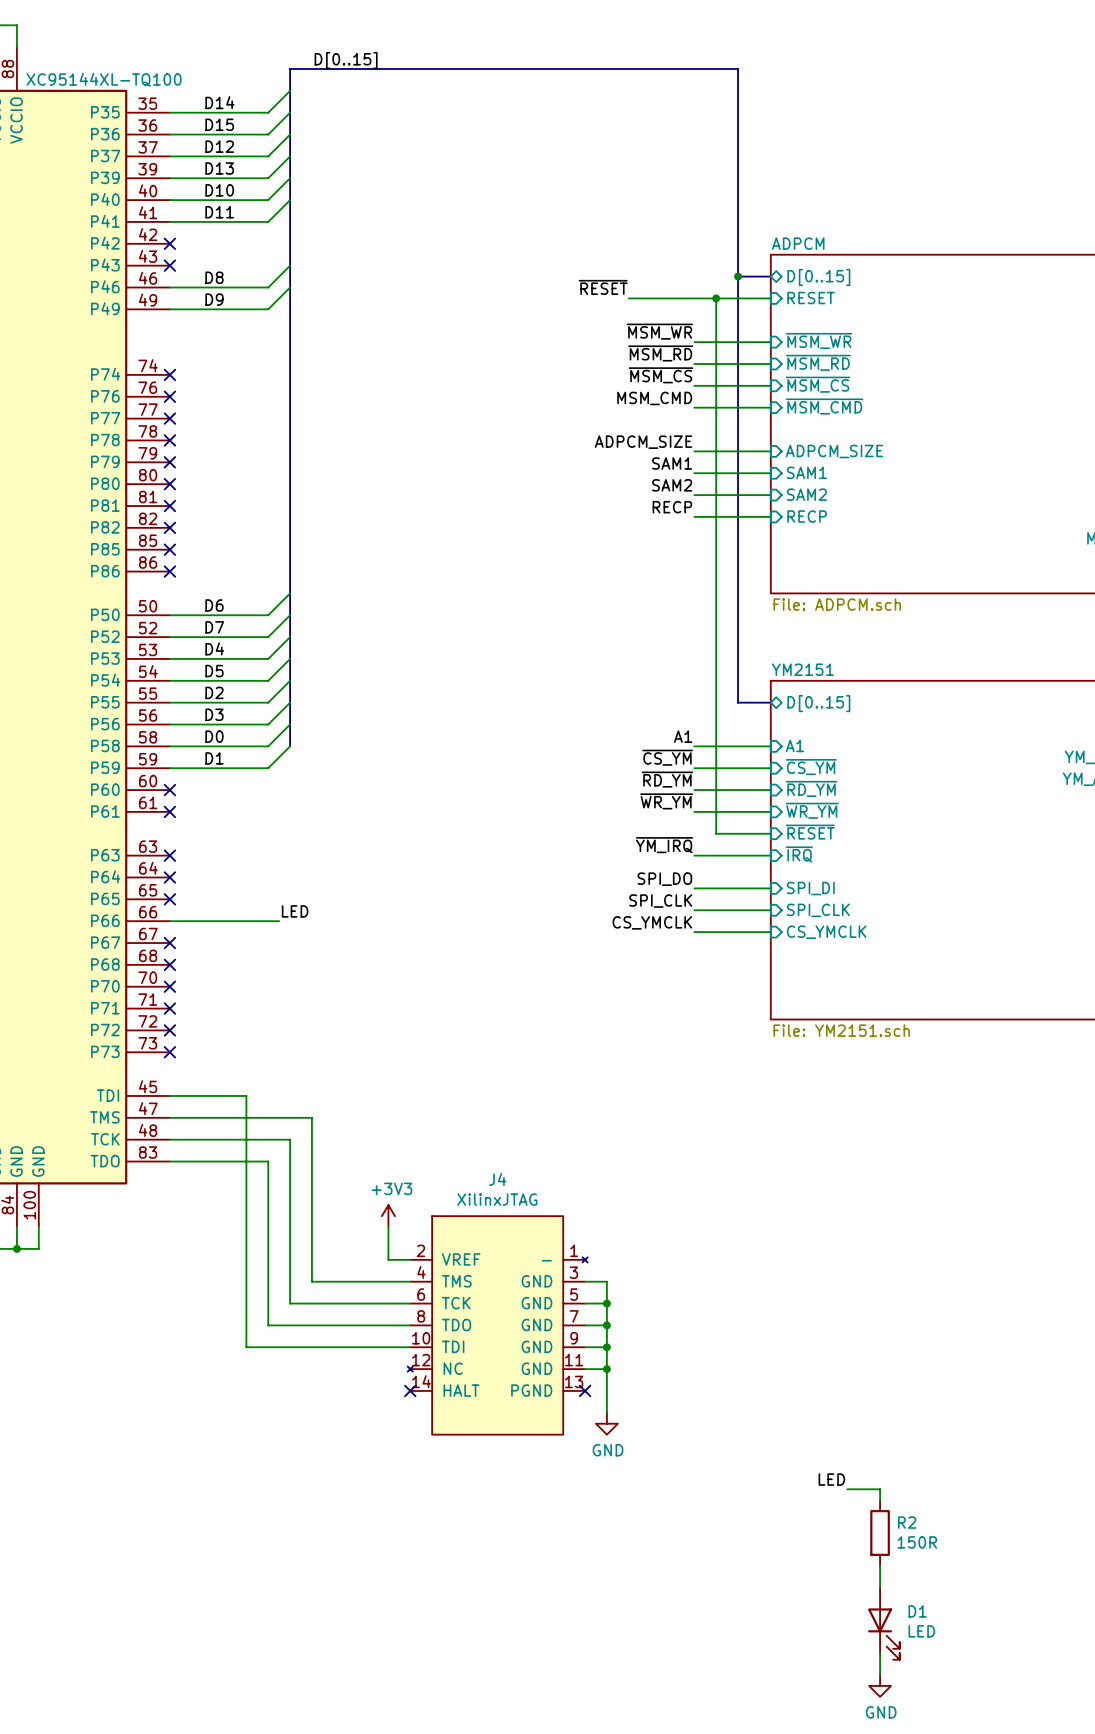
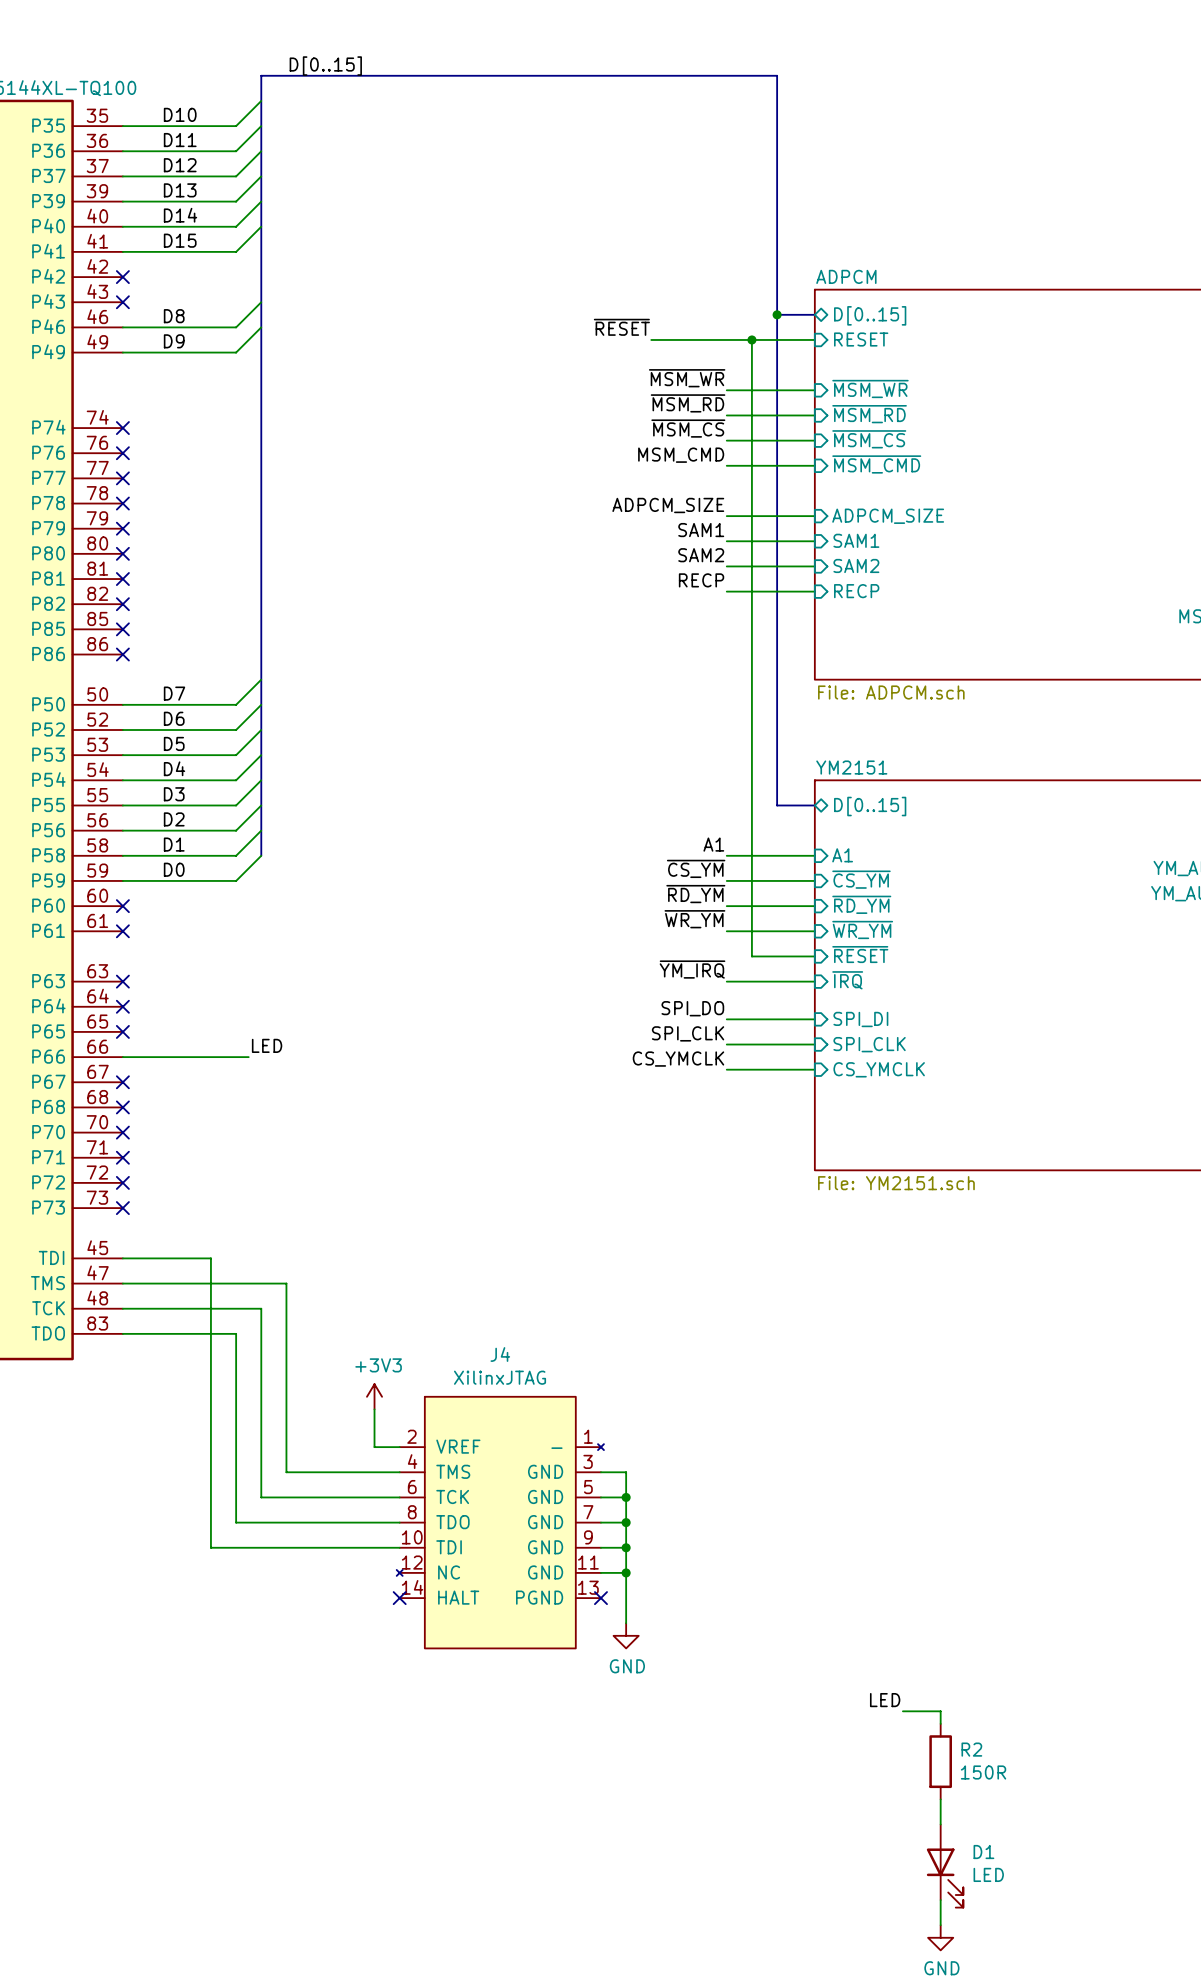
label: D14 (219, 102) -> D10 (180, 114)
label: D15 (219, 124) -> D11 (180, 140)
label: D10 (219, 190) -> D14 (180, 215)
label: D11 (219, 212) -> D15 (180, 240)
label: D6 (214, 605) -> D7 (174, 693)
label: D7 (214, 627) -> D6 (174, 718)
label: D4 (214, 648) -> D5 (174, 743)
label: D5 (214, 671) -> D4 (174, 768)
label: D2 (214, 692) -> D3 (174, 794)
label: D3 (214, 714) -> D2 (174, 819)
label: D0 (214, 736) -> D1 (174, 844)
label: D1 (214, 758) -> D0 (174, 869)

